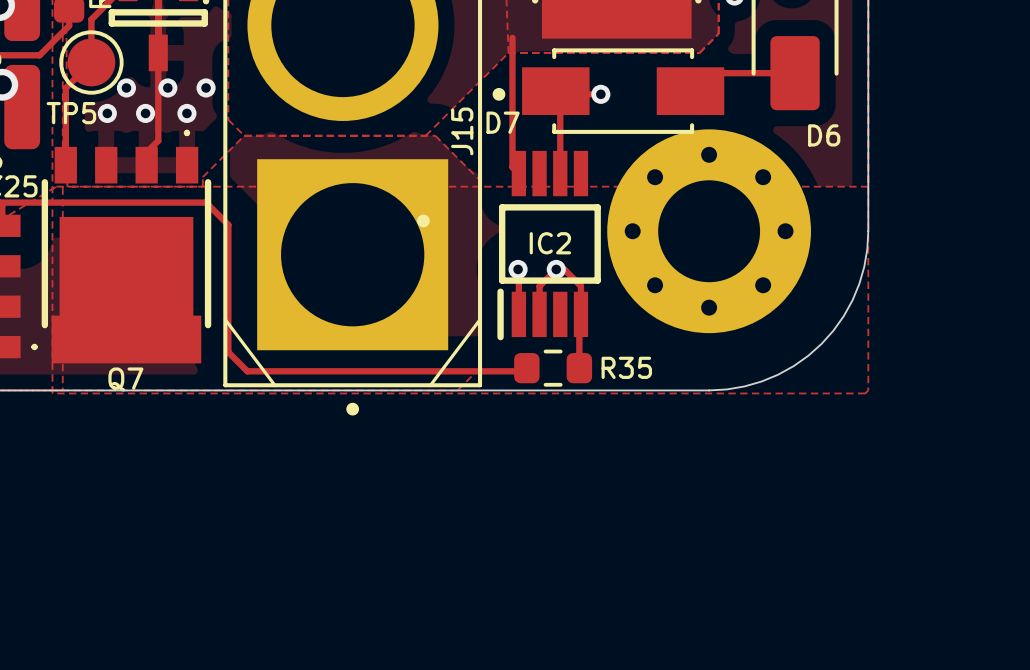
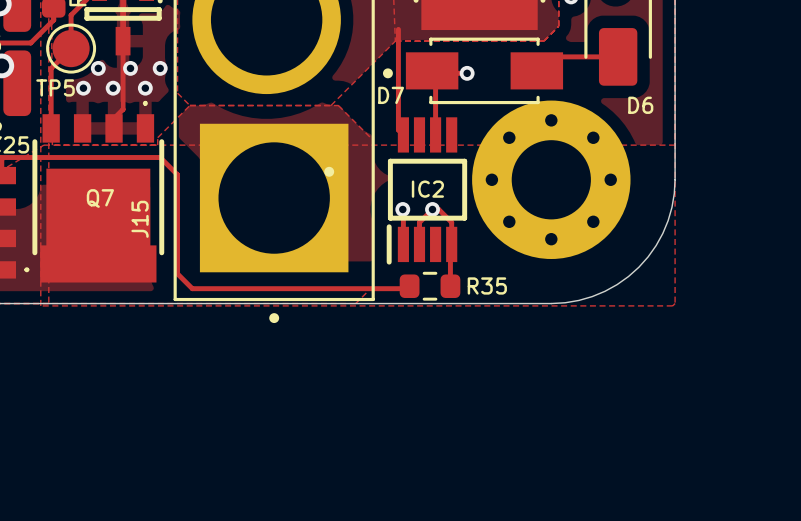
J15 name position: J15 (462, 131) -> J15 (140, 219)
line: (225, 319) (275, 385) -> none
line: (480, 319) (430, 385) -> none
Q7 name position: Q7 (125, 379) -> Q7 (100, 198)

